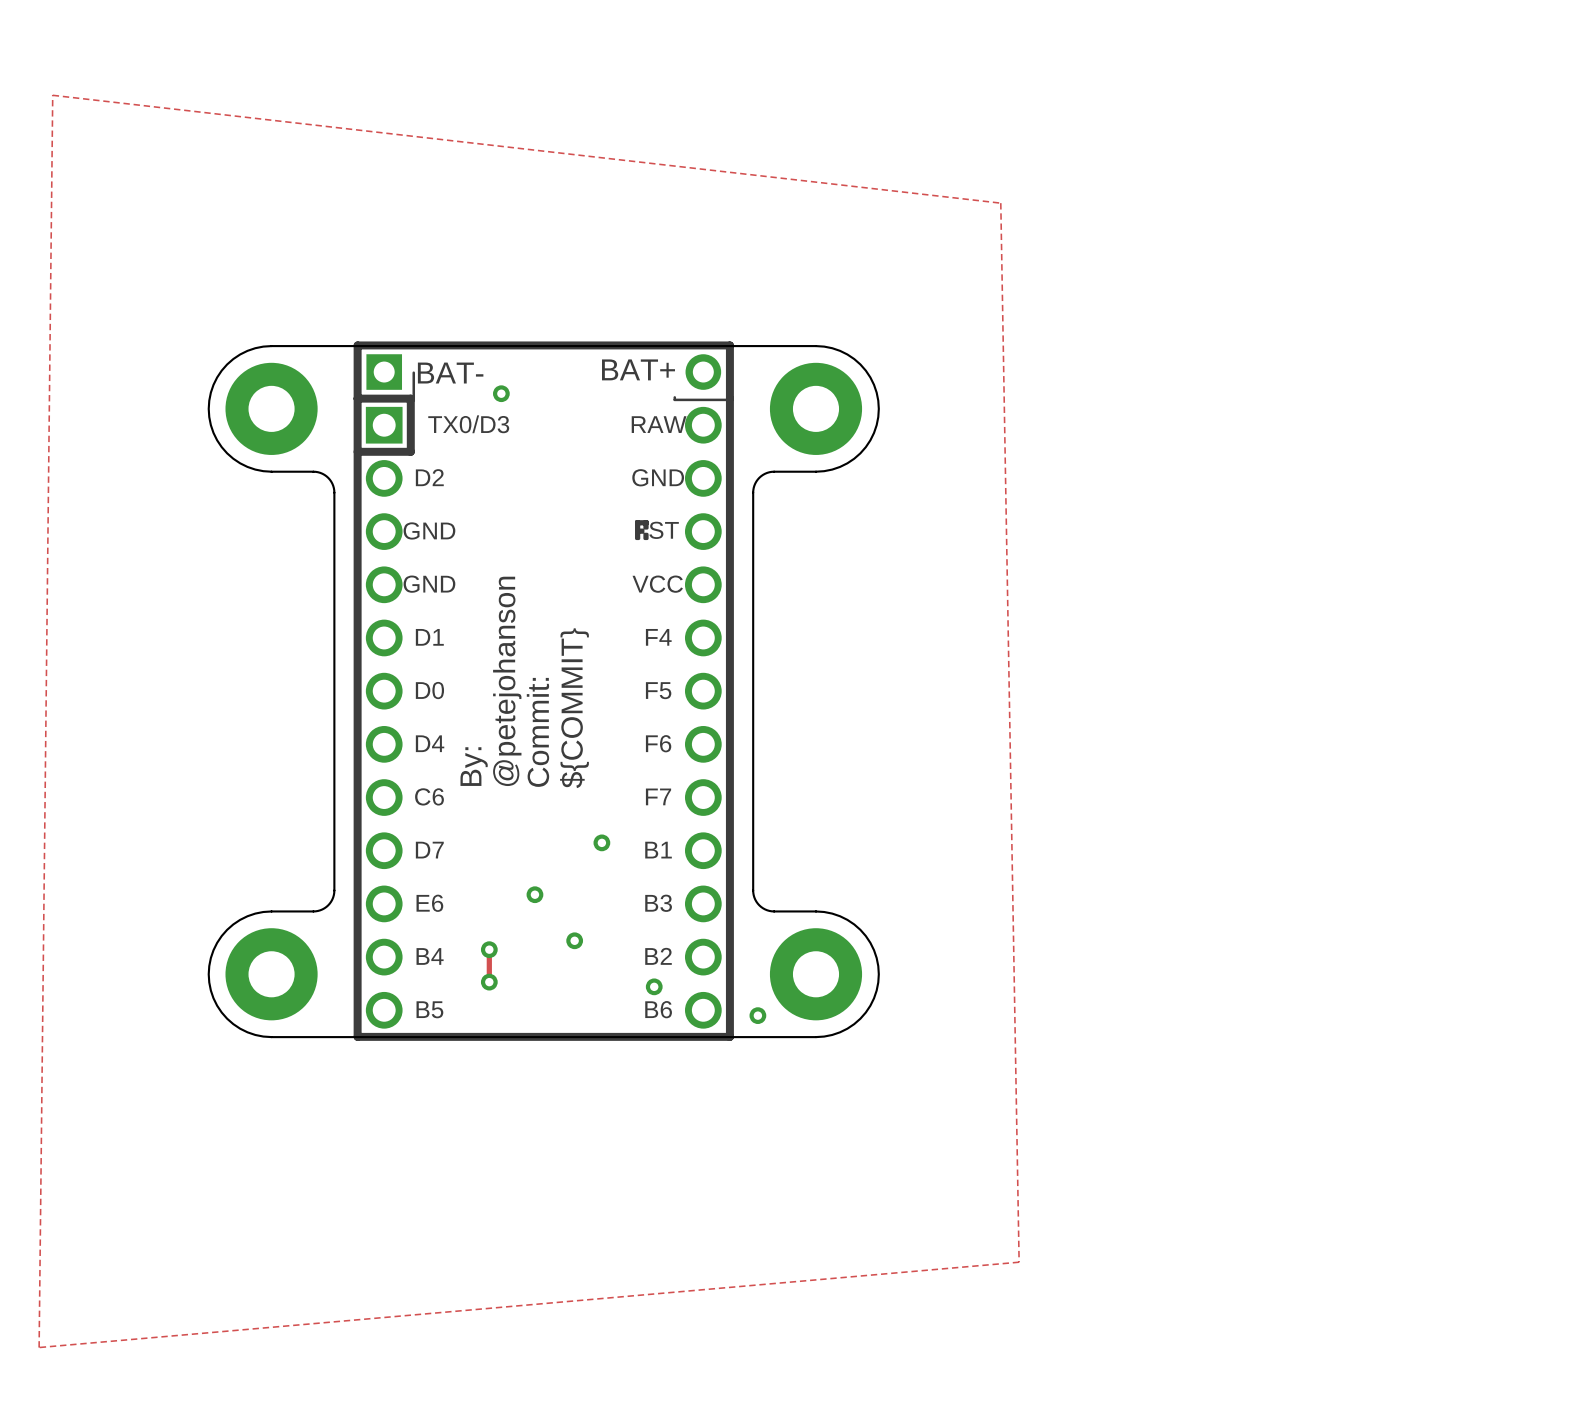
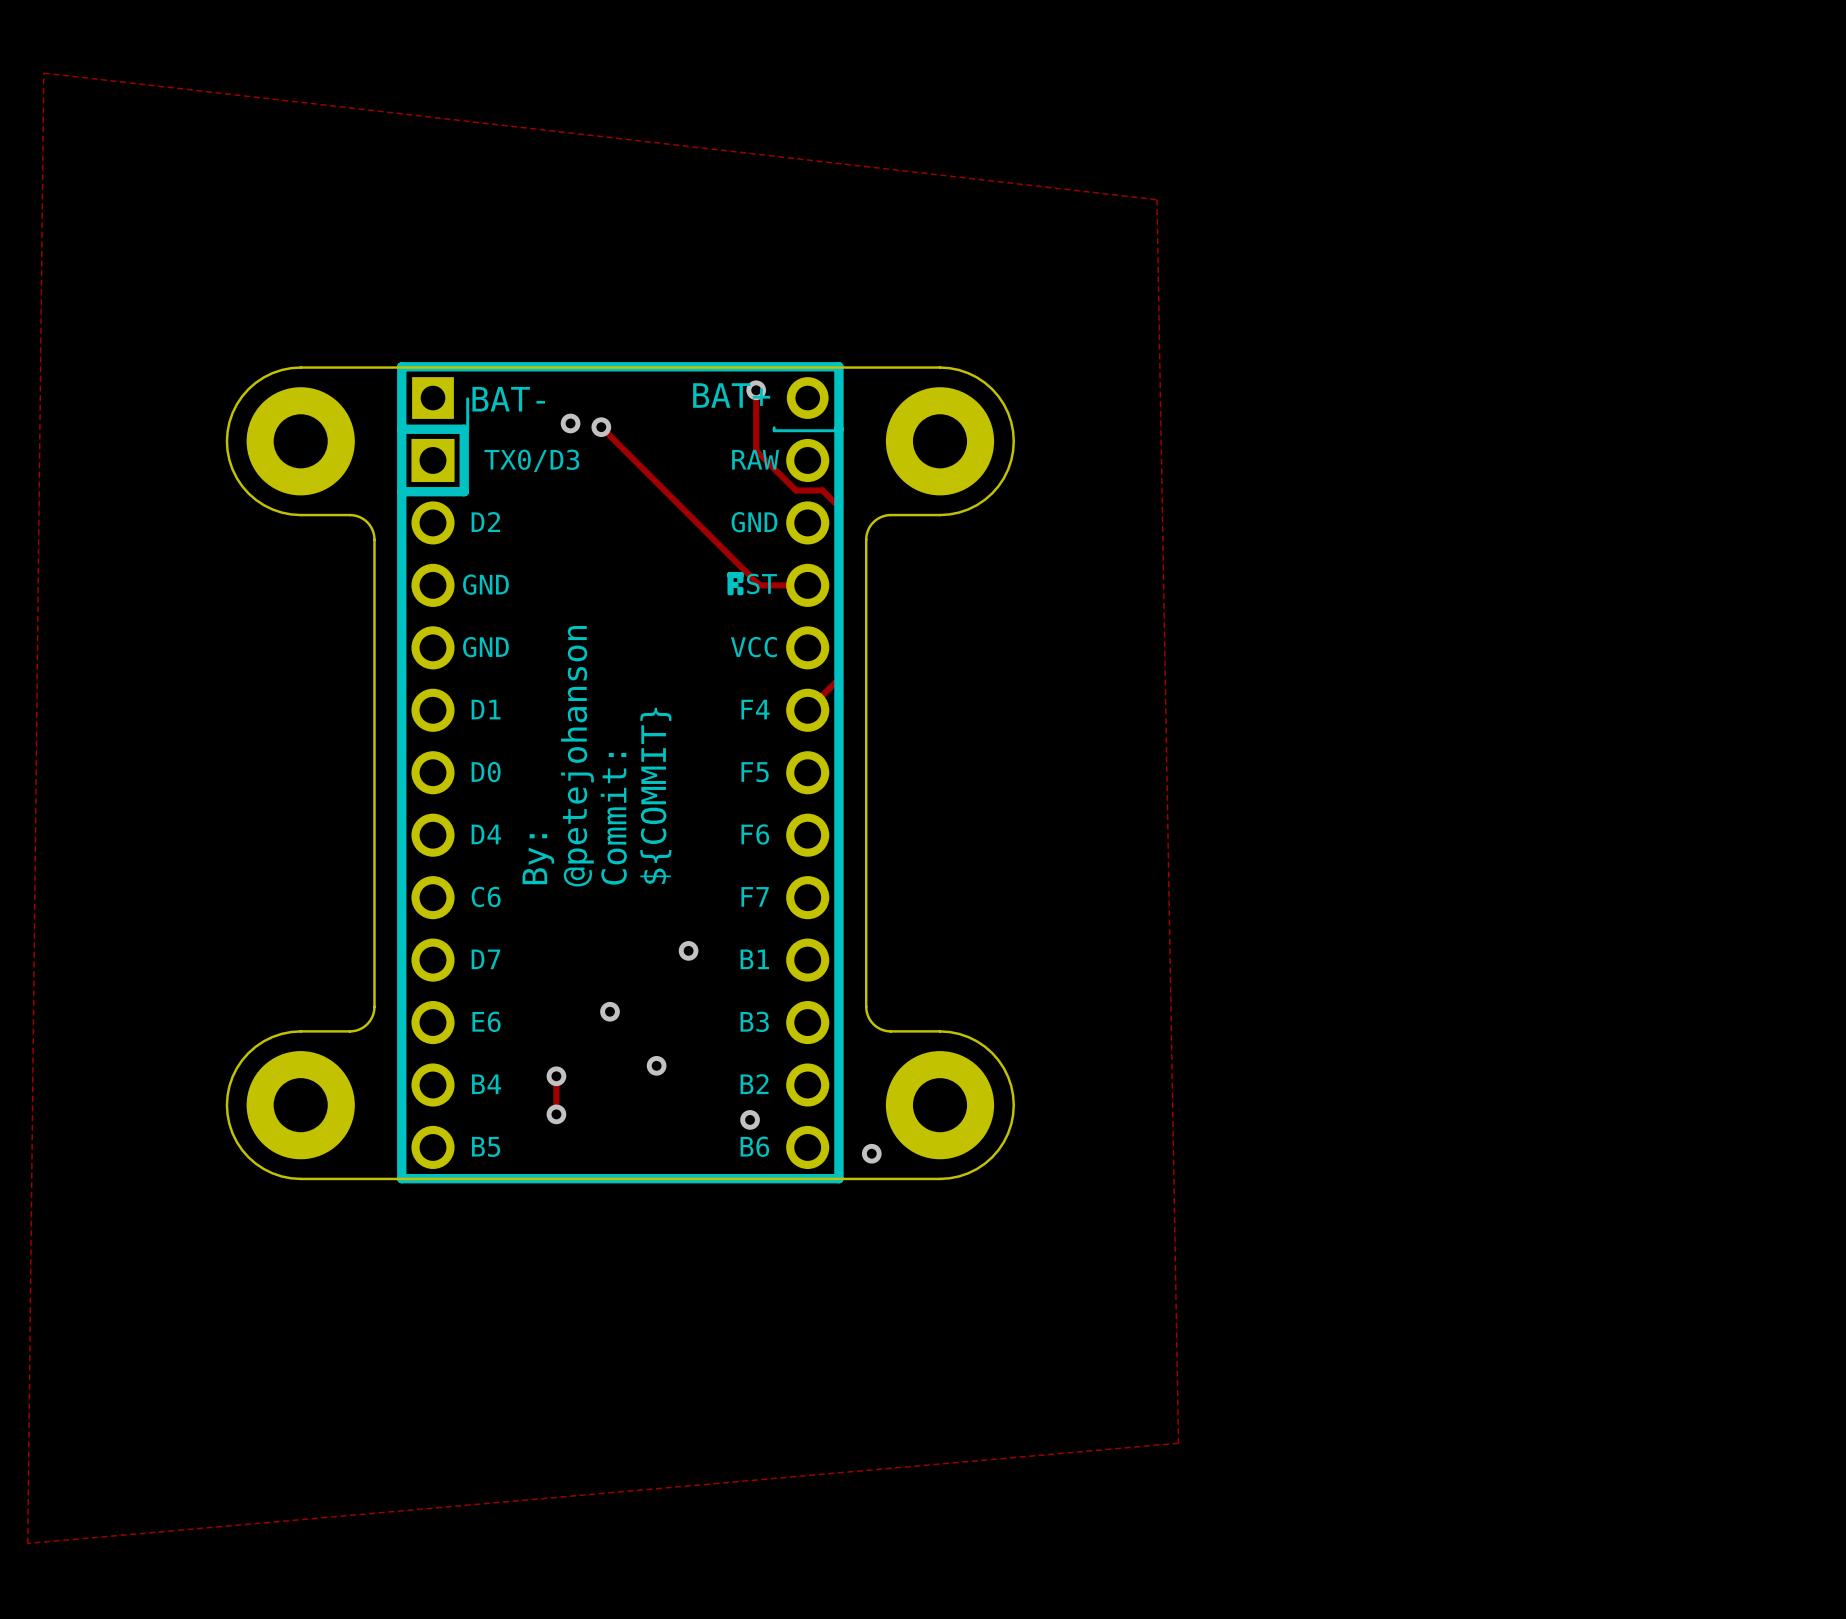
track: none -> (756, 390) (756, 450) (795, 490) (822, 490) (838, 506) (838, 679) (807, 710)
via: none -> (756, 390)
track: none -> (601, 427) (759, 585) (807, 585)
via: none -> (601, 427)

